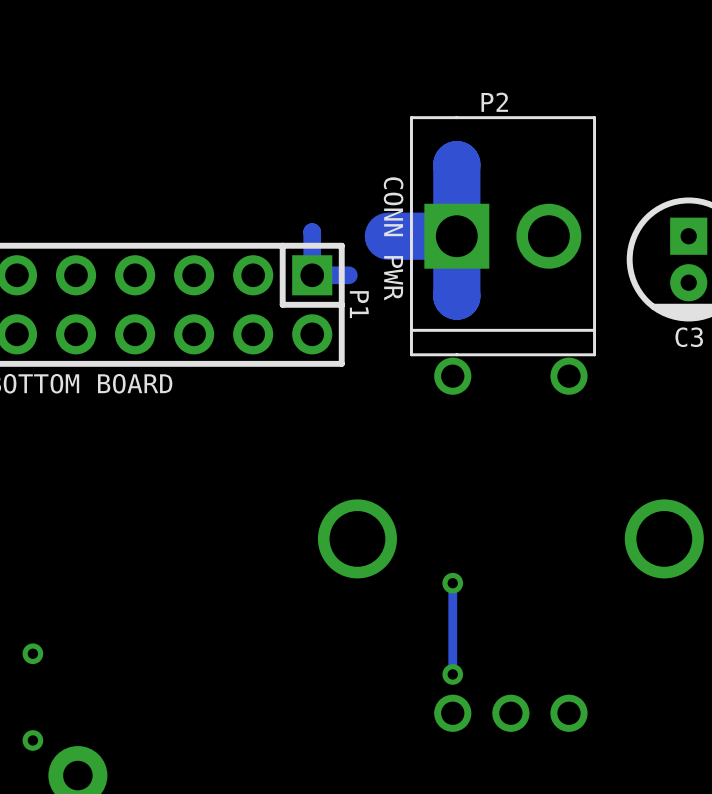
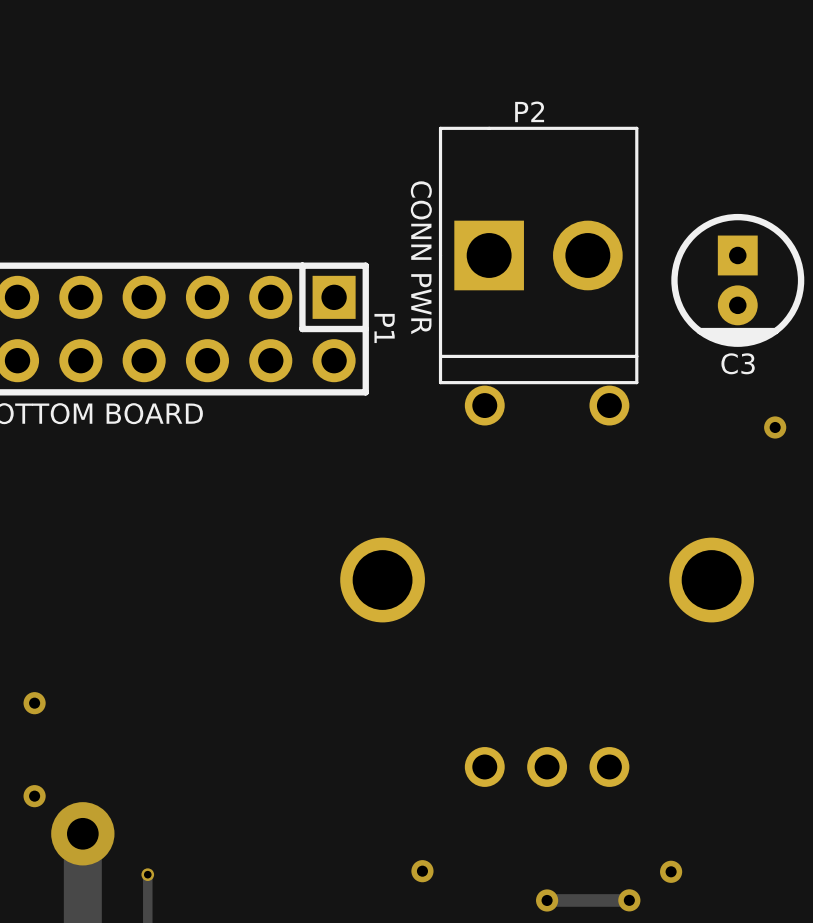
track: (456, 164) (456, 296) -> none
track: (312, 232) (312, 275) (348, 275) -> none
track: (456, 236) (388, 236) -> none
track: (452, 583) (452, 674) -> none
via: (452, 583) -> none
via: (452, 674) -> none

